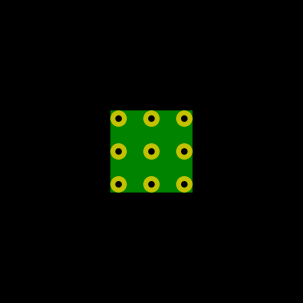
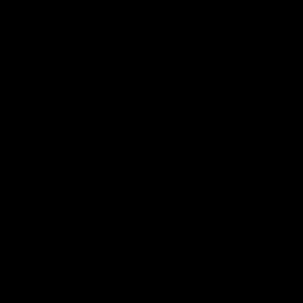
part: (151, 151) -> none

